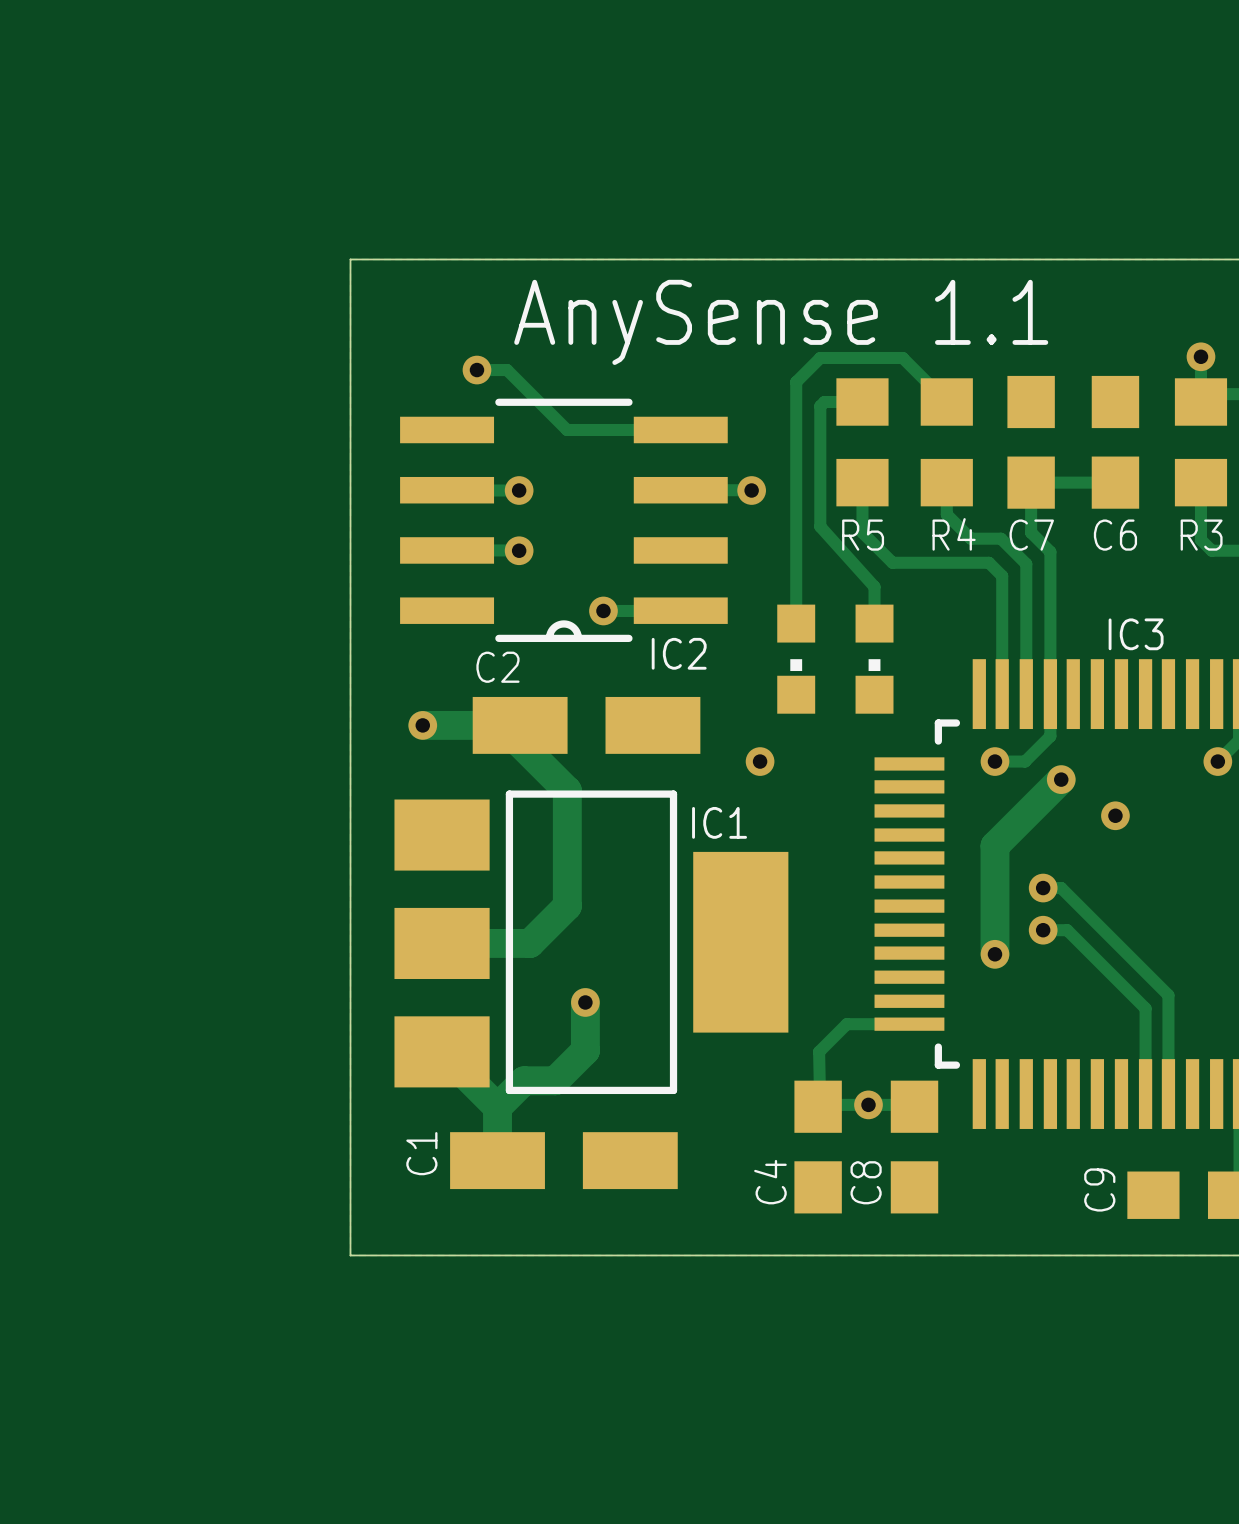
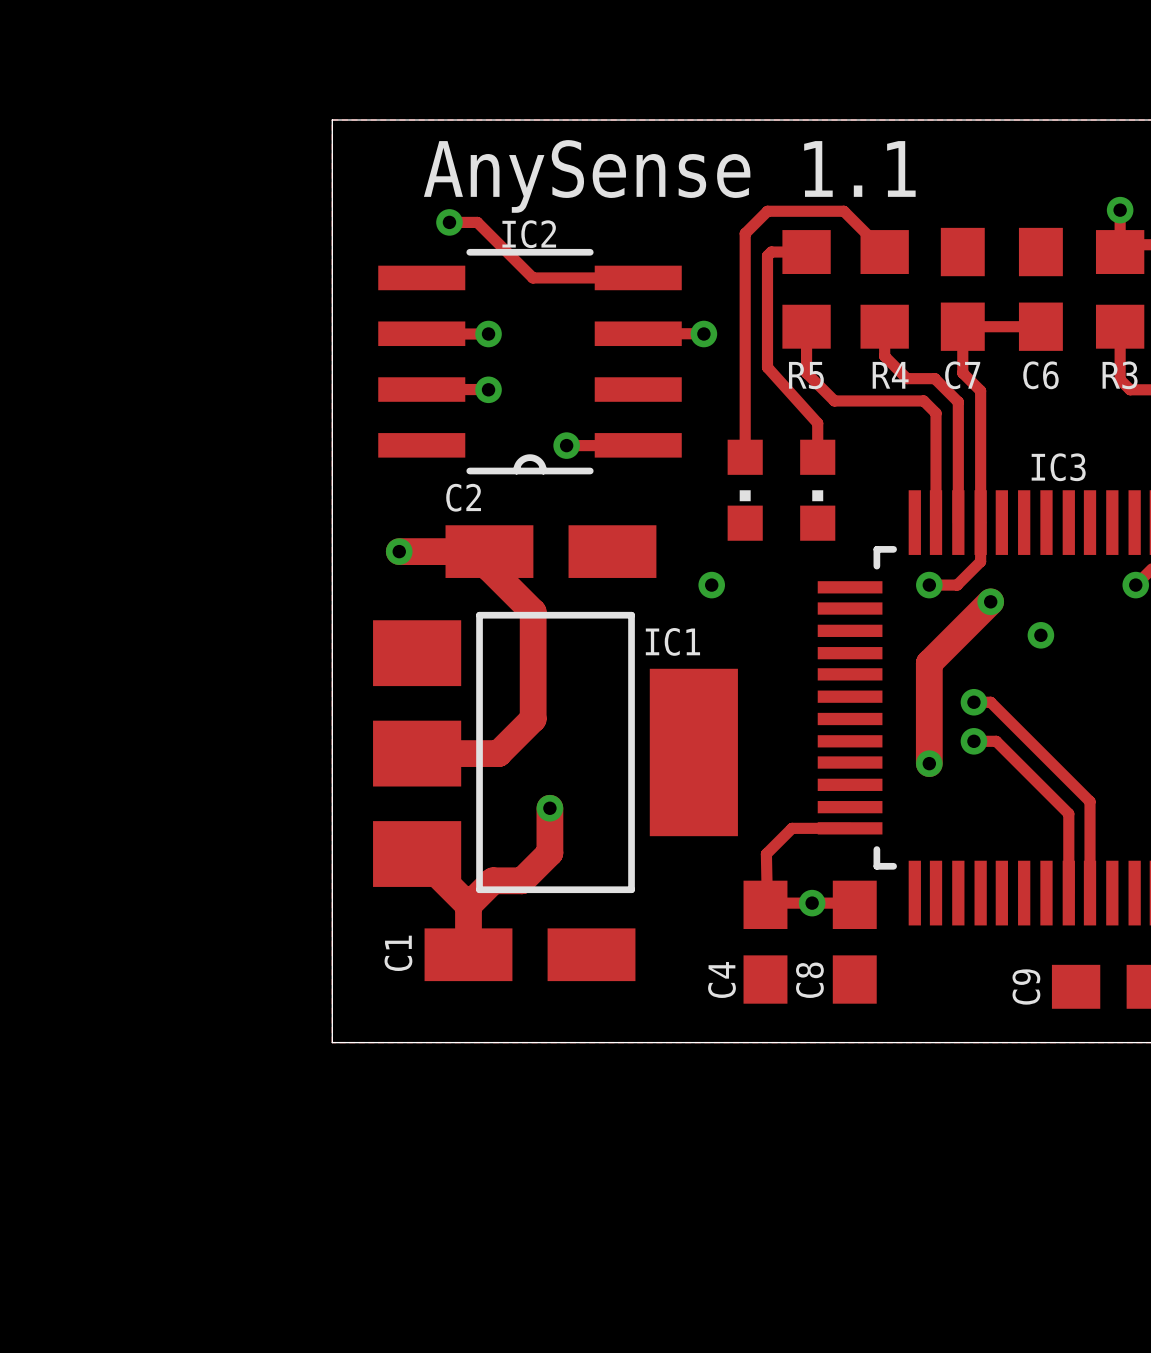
text position: AnySense 1.1 (781, 322) -> AnySense 1.1 (669, 176)
IC2 name position: IC2 (679, 653) -> IC2 (529, 234)

